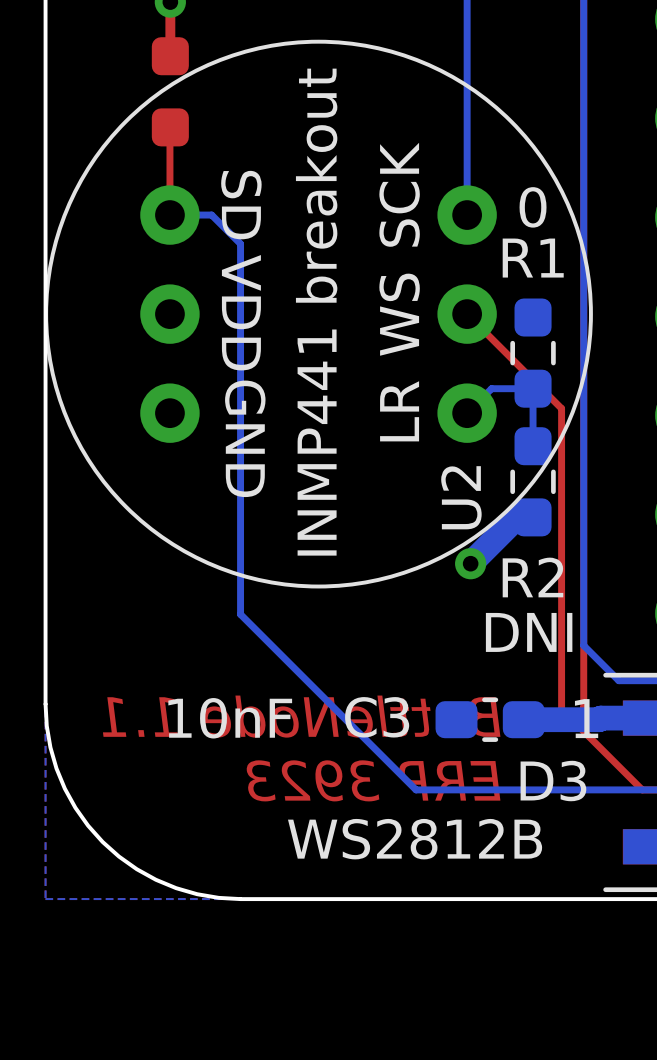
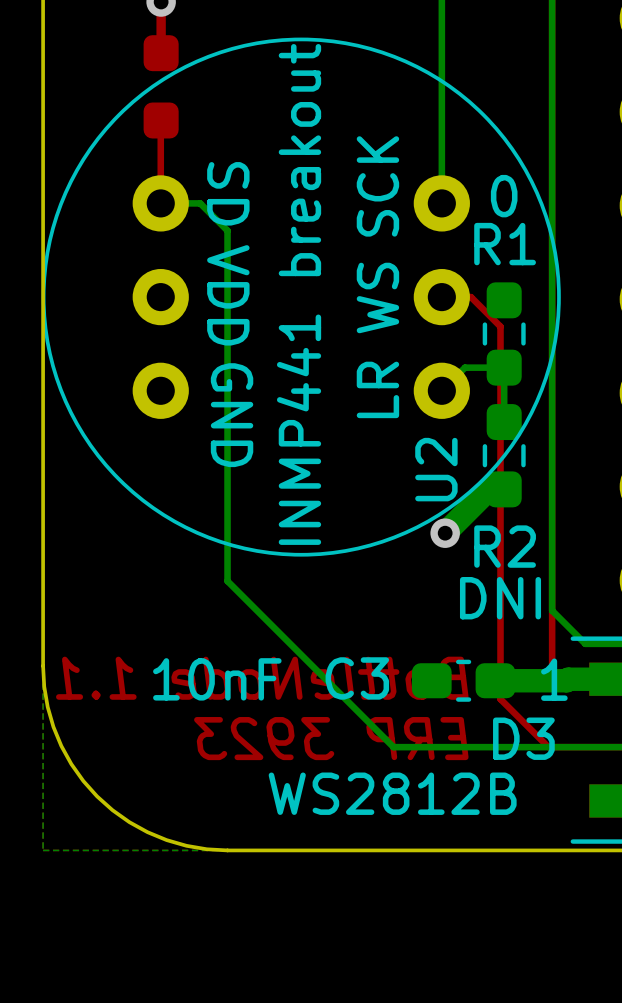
top track: (467, 314) (561, 408) (561, 709) (642, 789) -> (441, 297) (470, 297) (500, 326) (500, 699) (548, 747) (607, 747)

